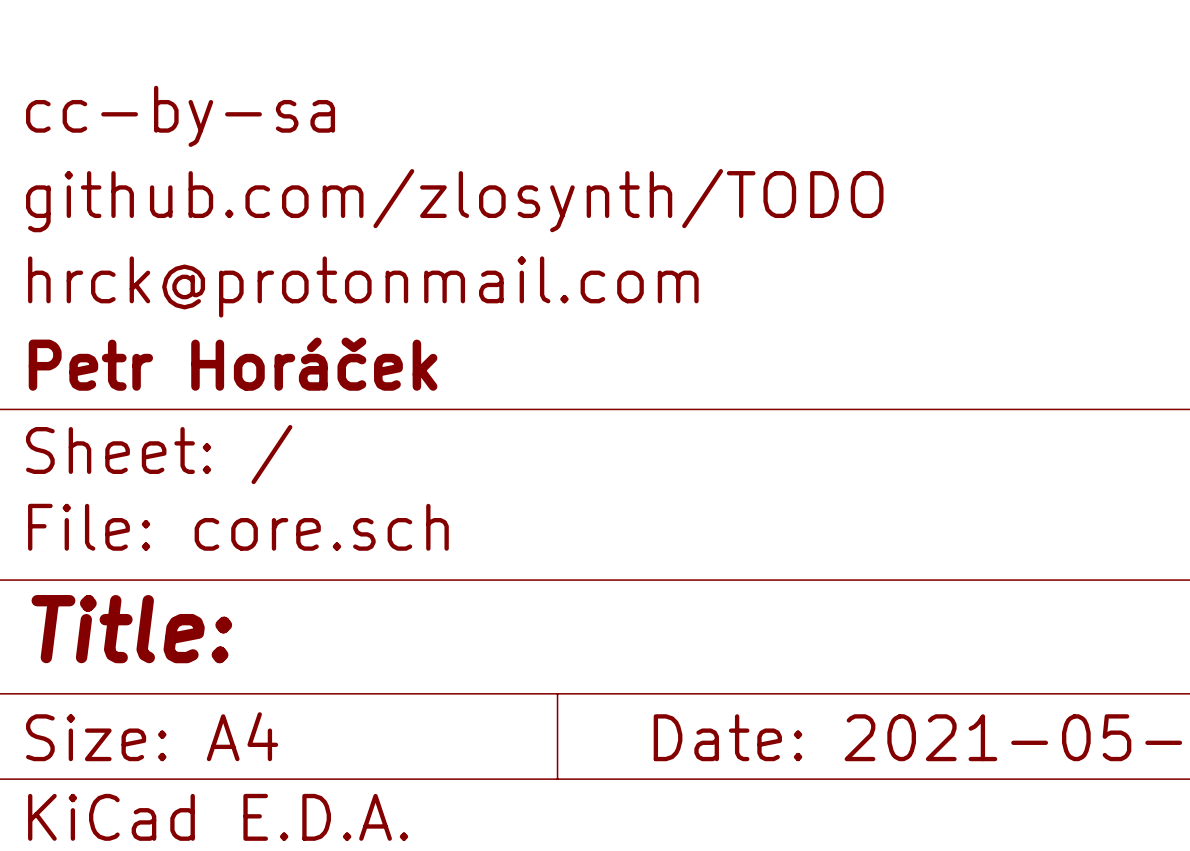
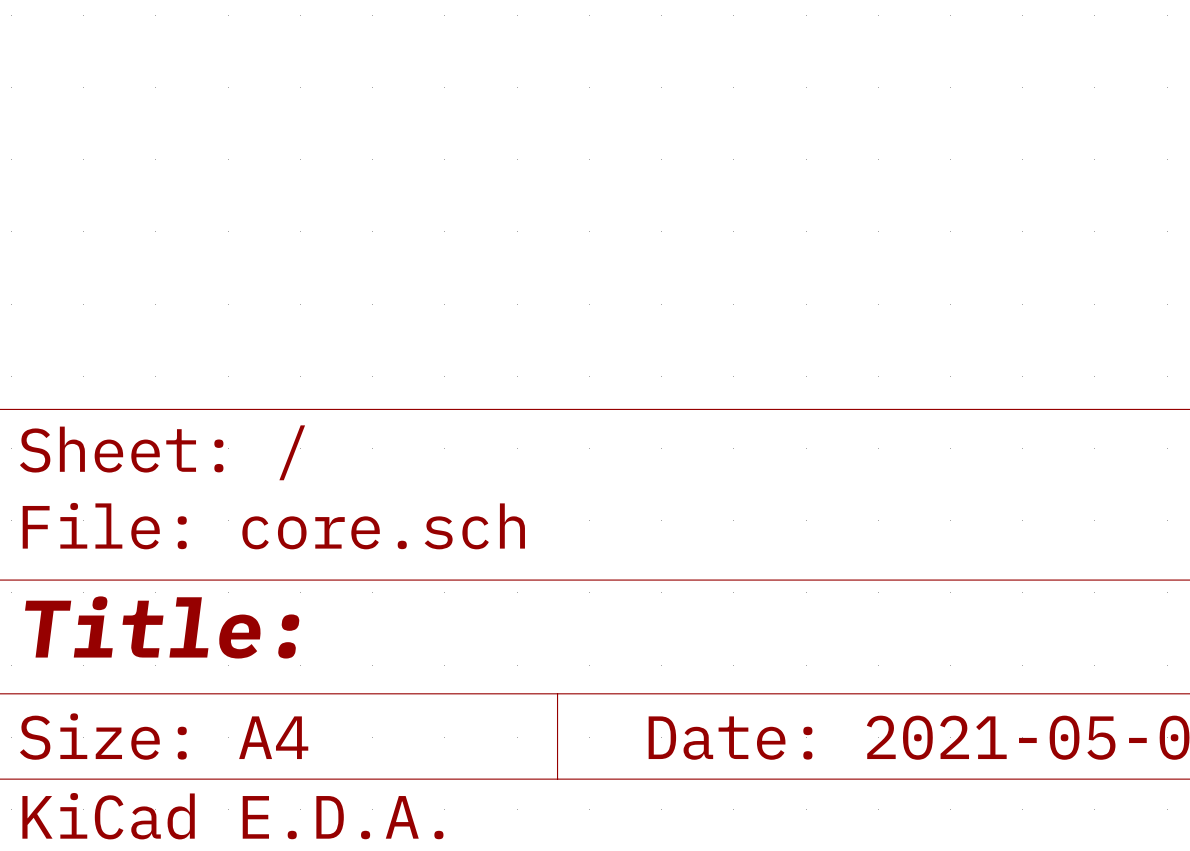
title block: cc-by-sa (180, 116) -> none
title block: github.com/zlosynth/TODO (454, 200) -> none
title block: hrck@protonmail.com (363, 286) -> none
title block: Petr Horáček (233, 364) -> none

